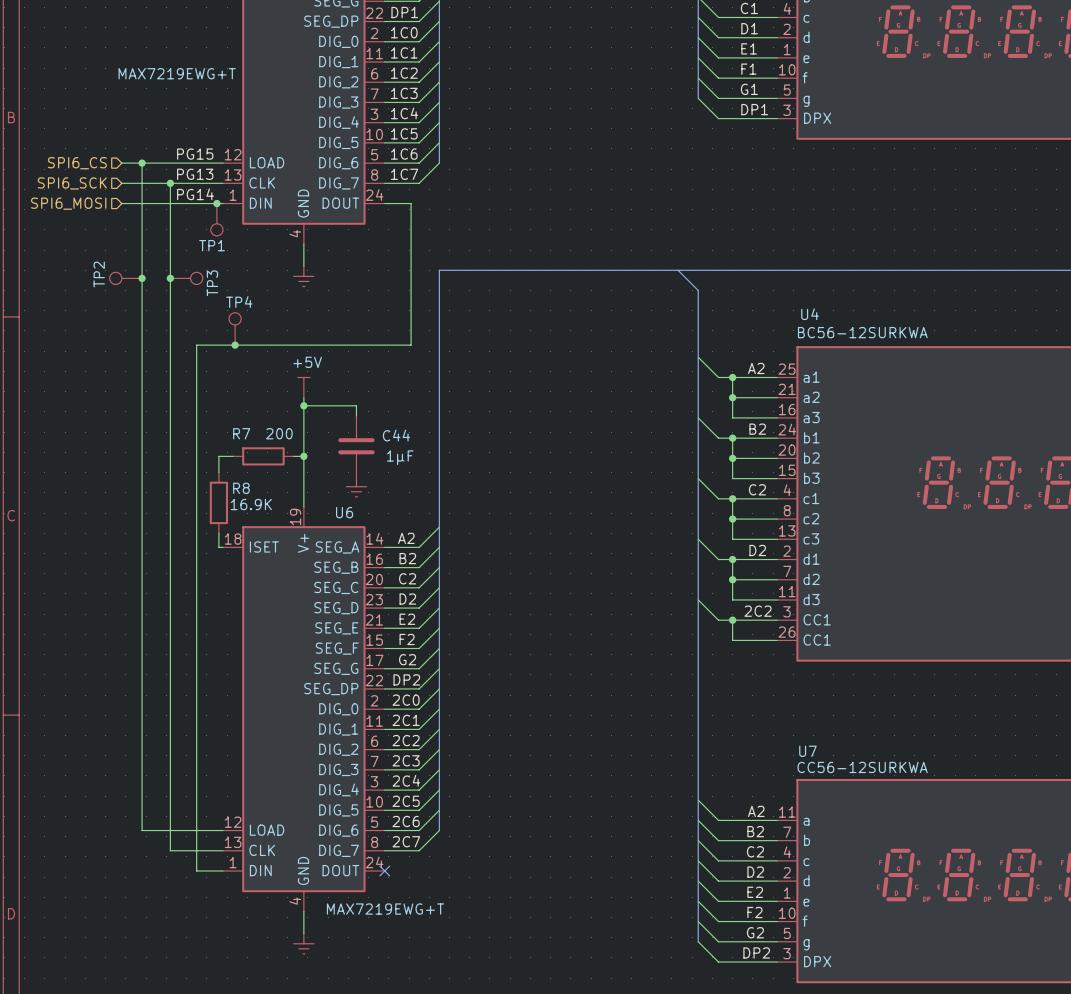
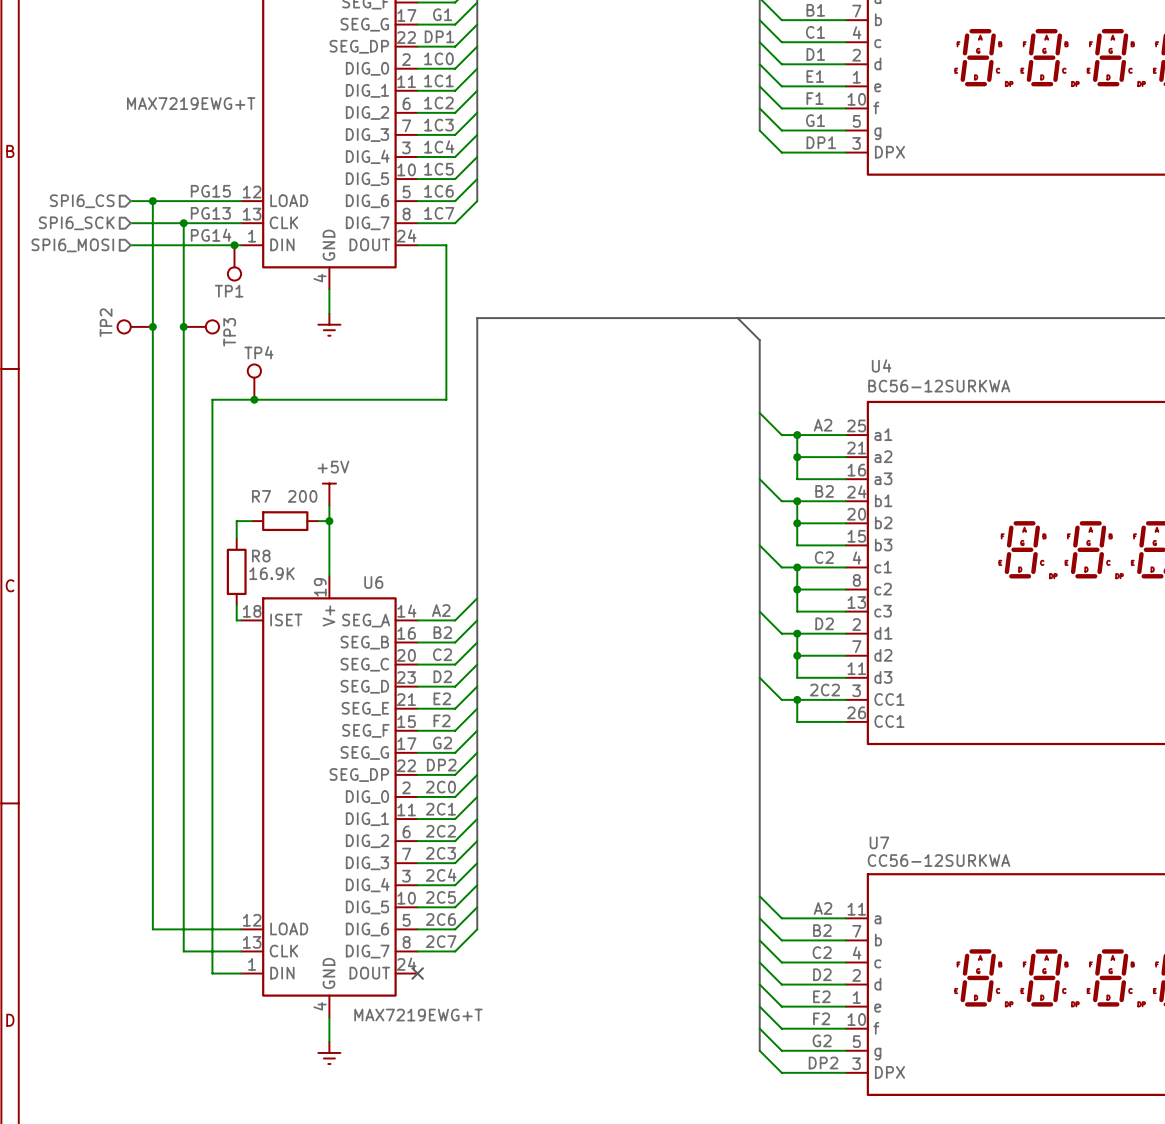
power symbol position: +5V (303, 387) -> +5V (329, 494)
wire: (303, 397) (303, 442) -> none
wire: (303, 405) (356, 405) (356, 415) -> none
junction: (303, 405) -> none
C44: 1µF (356, 446) -> none
power symbol: (356, 486) -> none

